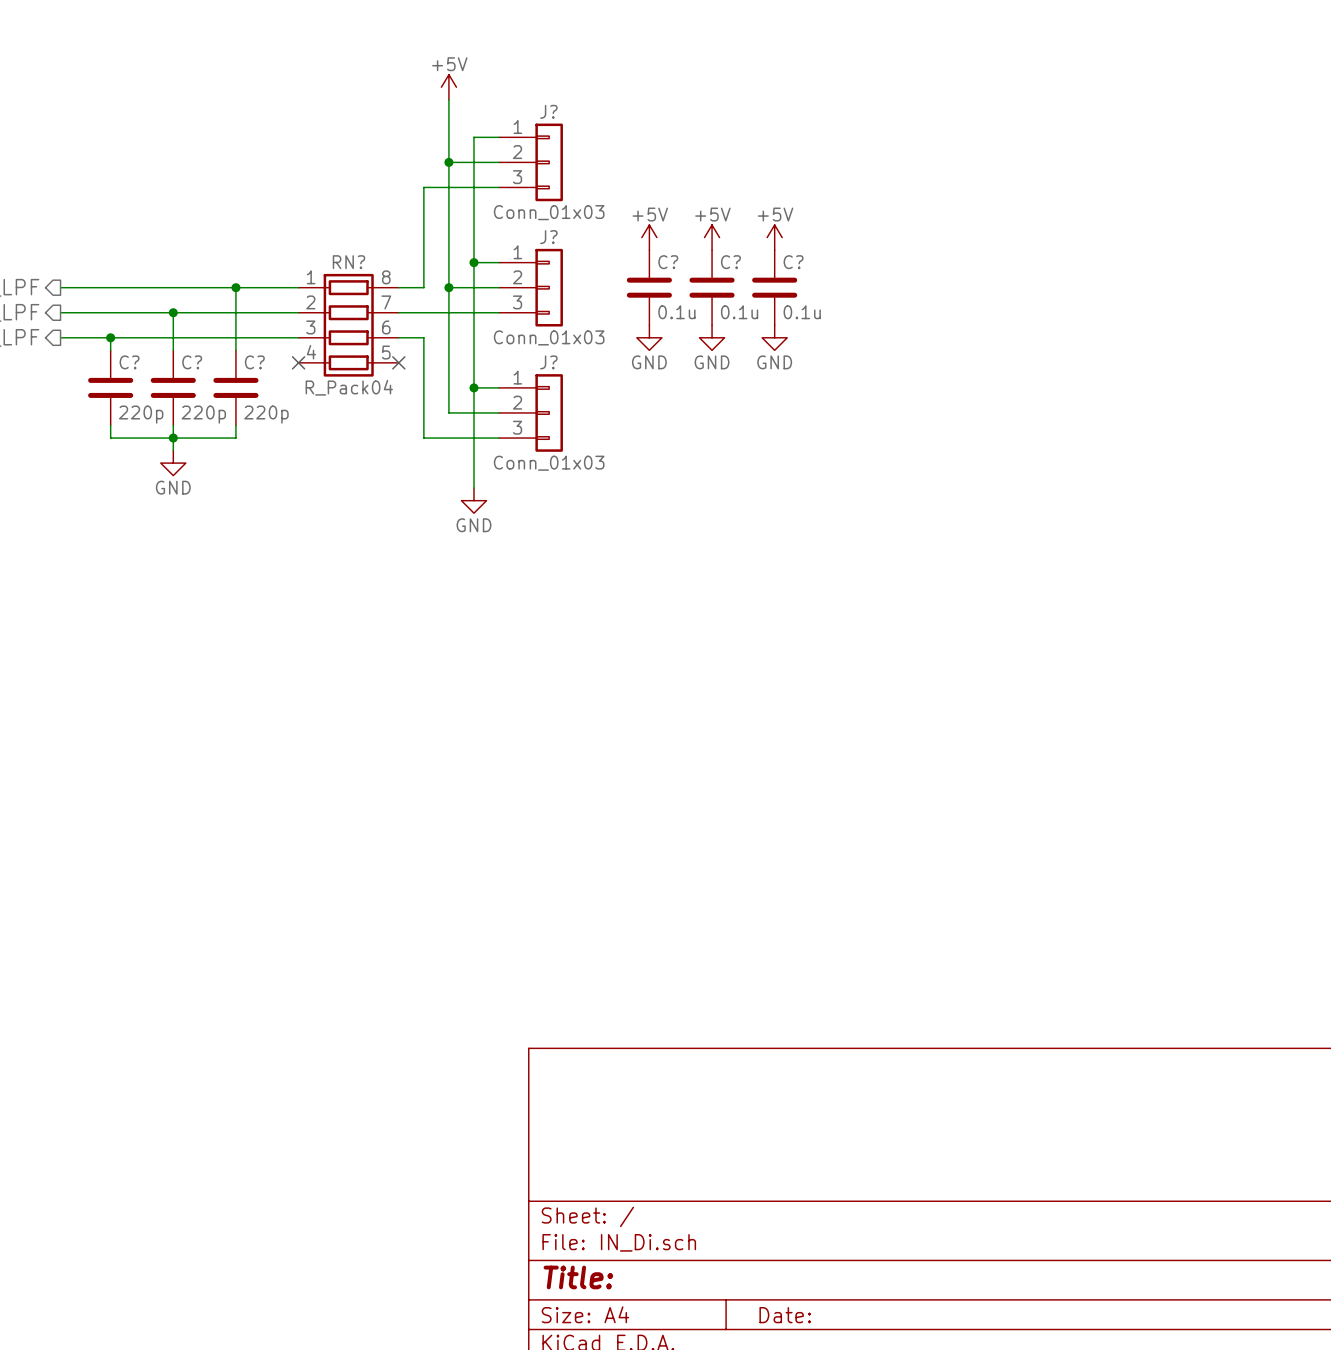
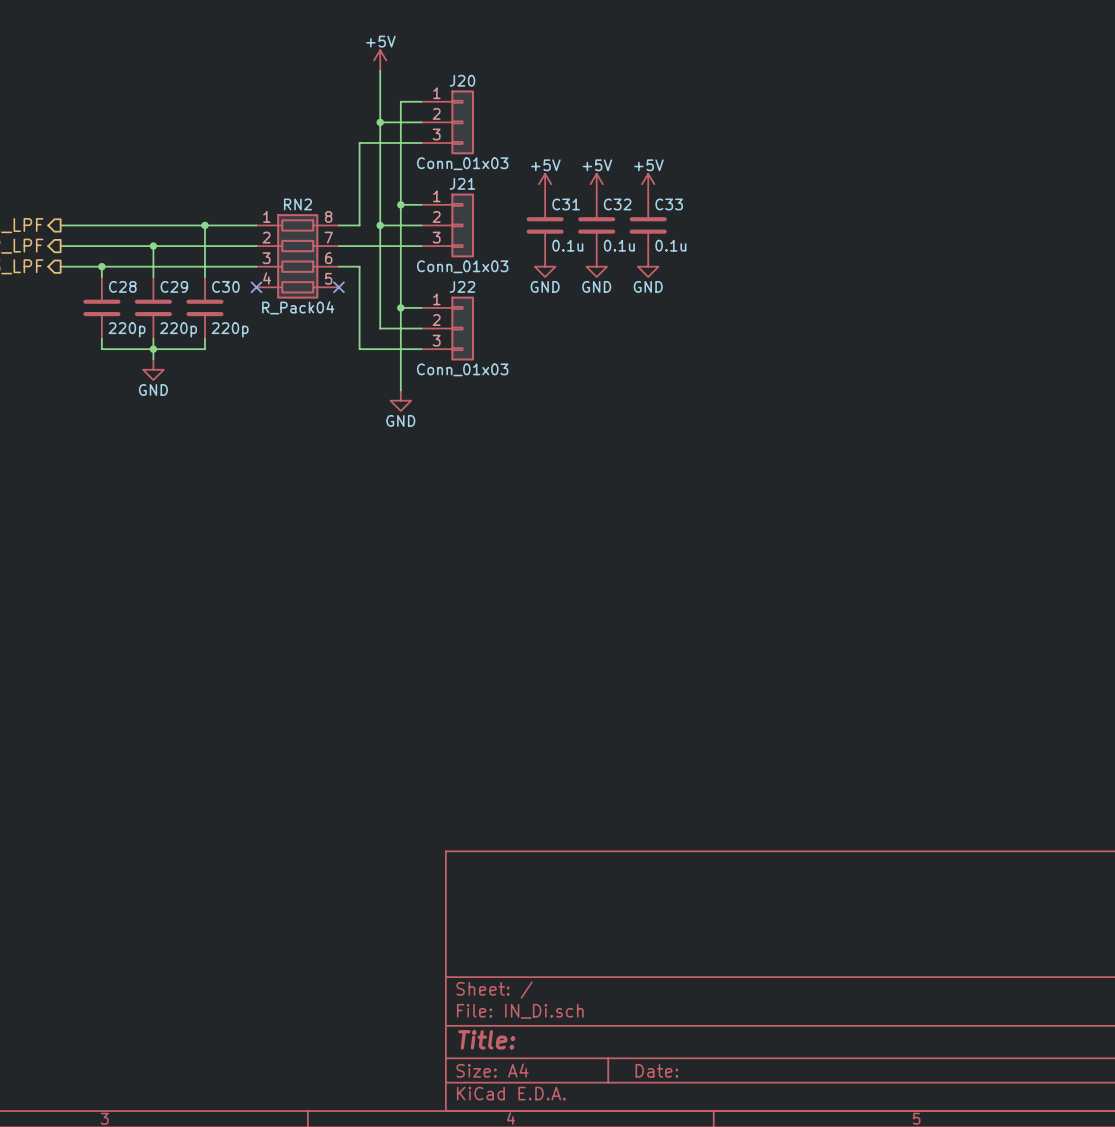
J? name: J? (548, 111) -> J20 (462, 80)
J? name: J? (548, 237) -> J21 (462, 183)
RN? name: RN? (349, 262) -> RN2 (297, 204)
C? name: C? (668, 262) -> C31 (566, 204)
C? name: C? (730, 262) -> C32 (617, 204)
C? name: C? (793, 262) -> C33 (669, 204)
C? name: C? (129, 362) -> C28 (122, 286)
C? name: C? (192, 362) -> C29 (174, 286)
C? name: C? (254, 362) -> C30 (225, 286)
J? name: J? (548, 362) -> J22 (462, 286)

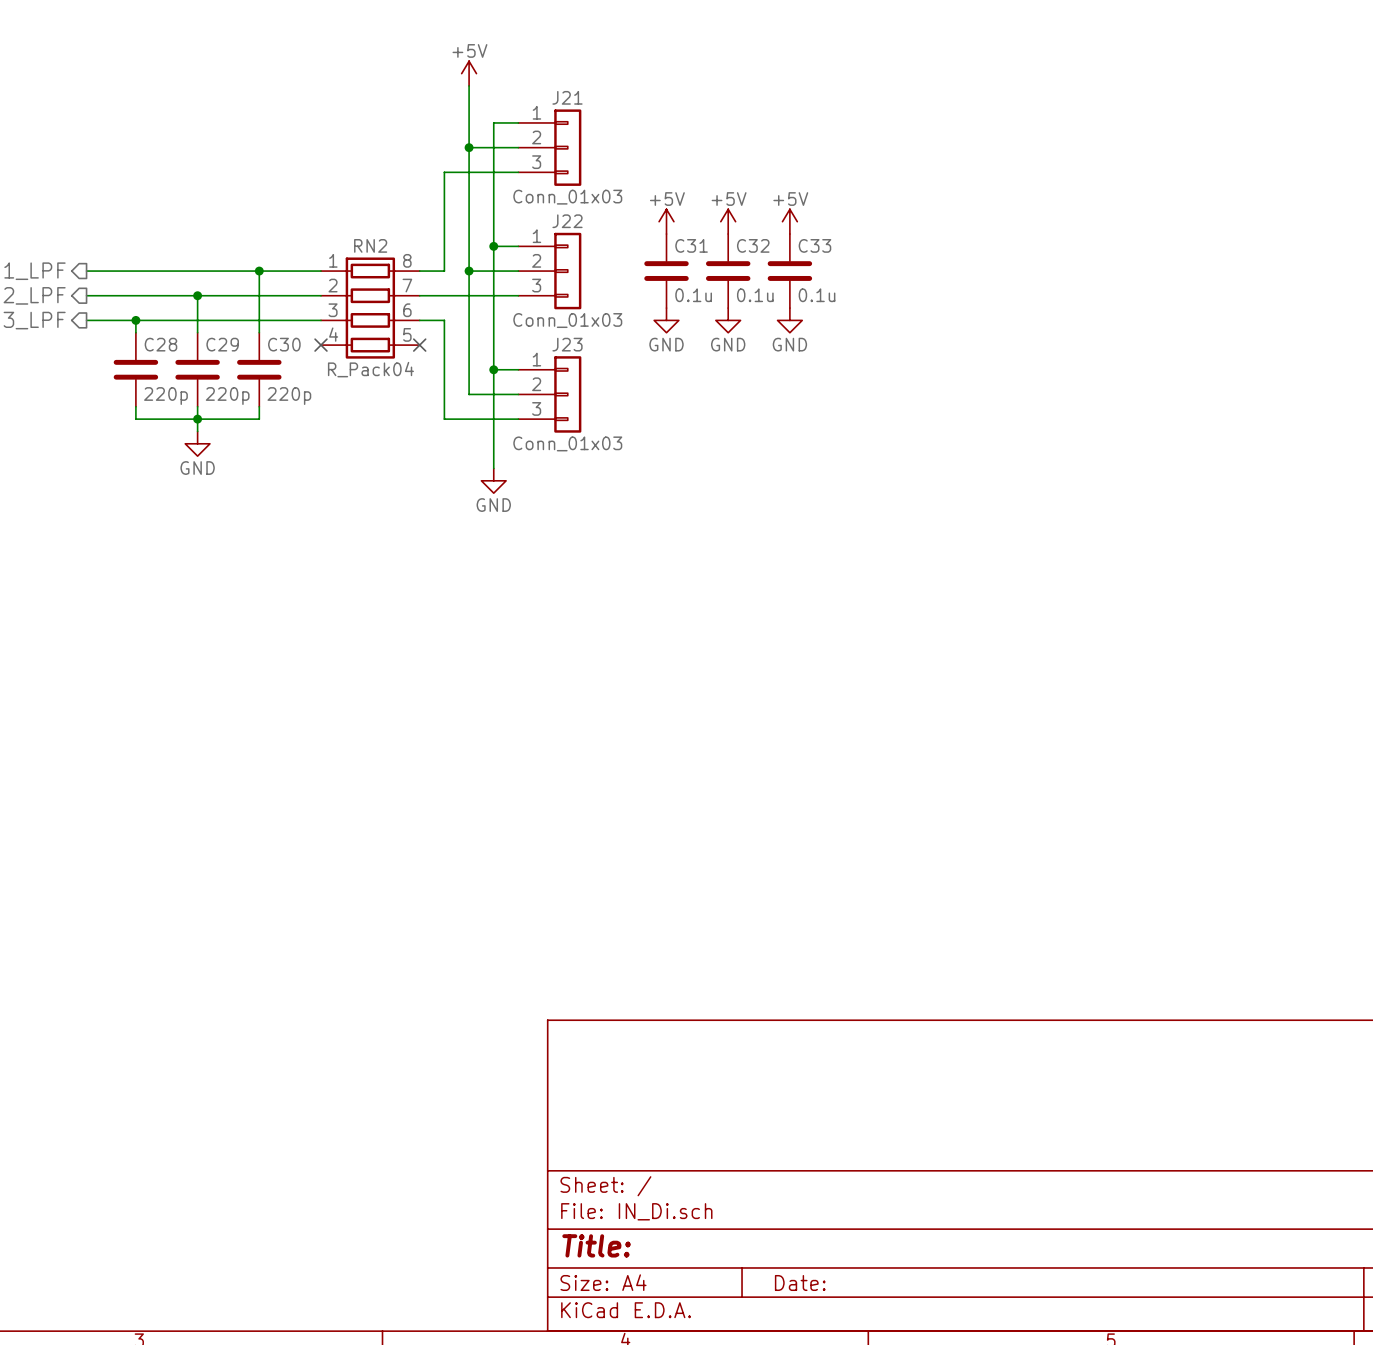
J20 name: J20 (462, 80) -> J21 (567, 97)
J21 name: J21 (462, 183) -> J22 (567, 221)
J22 name: J22 (462, 286) -> J23 (567, 344)

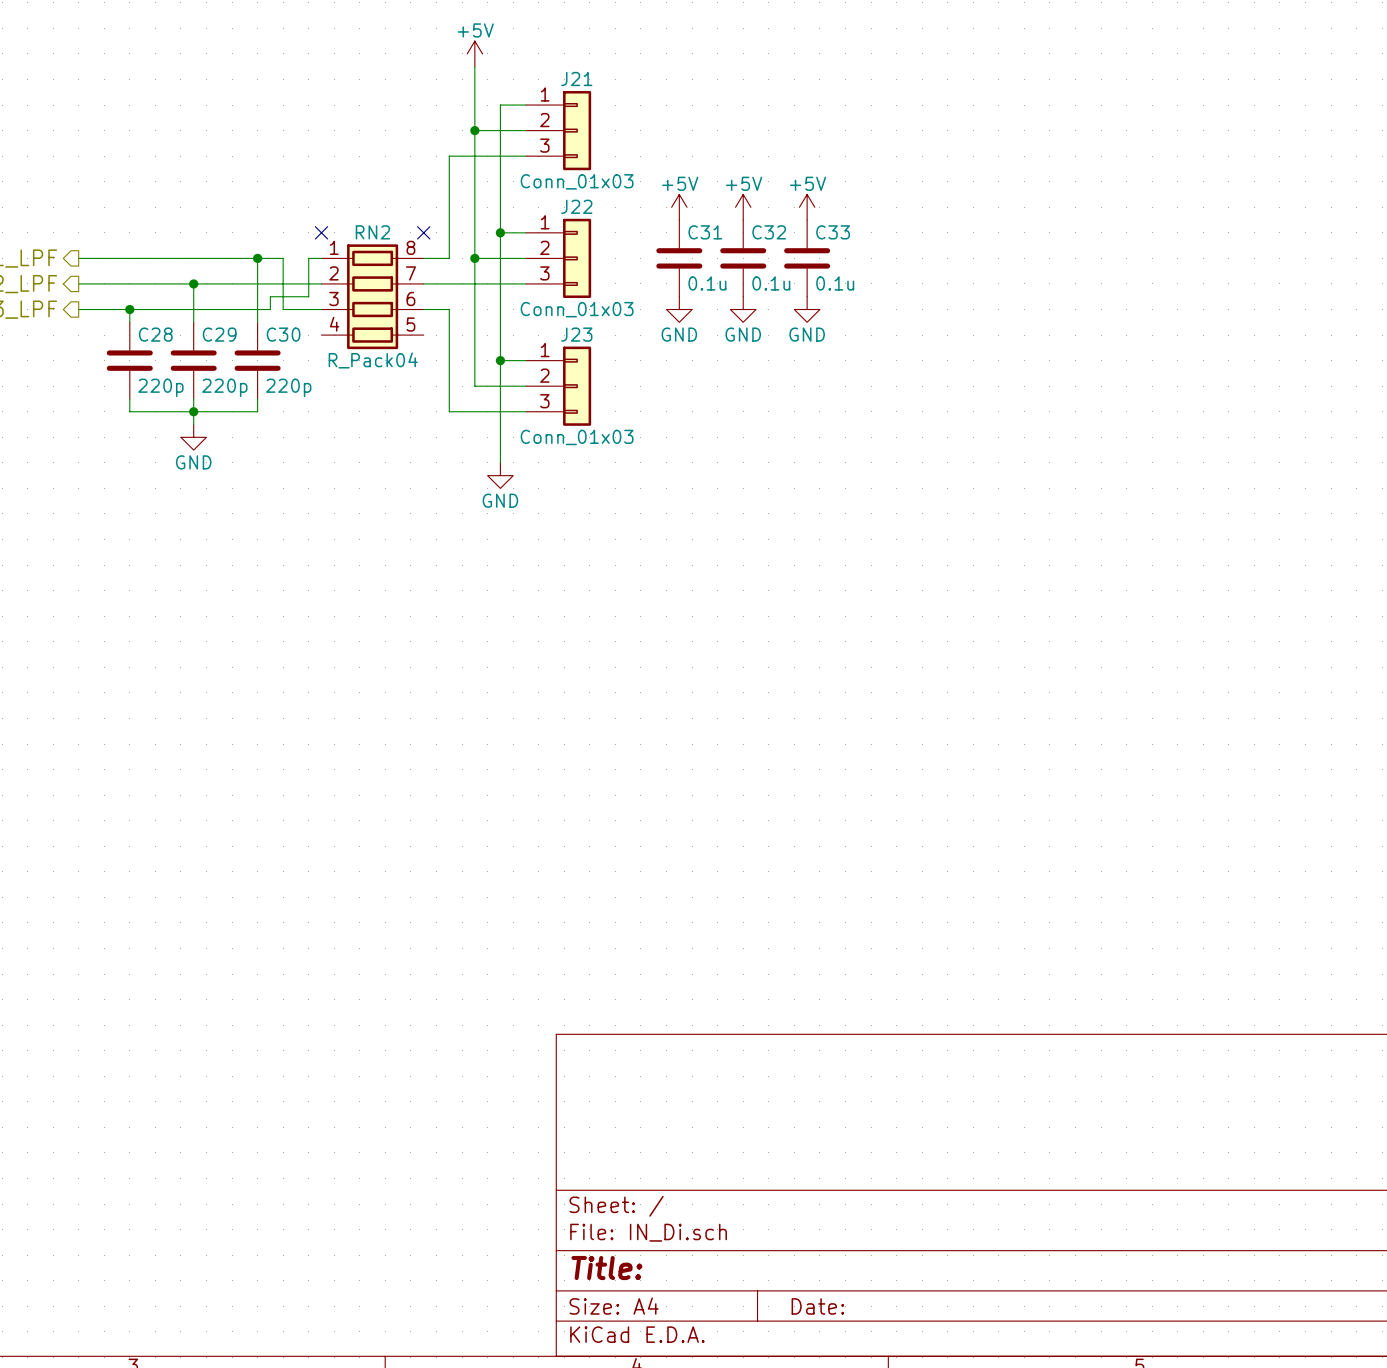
no-connect mark: none -> (321, 232)
no-connect mark: none -> (423, 232)
wire: (283, 271) (308, 271) -> (270, 309) (270, 296) (308, 296) (308, 258)
wire: (271, 320) (283, 320) -> (283, 258) (283, 309)
no-connect mark: (321, 345) -> none
no-connect mark: (419, 345) -> none

